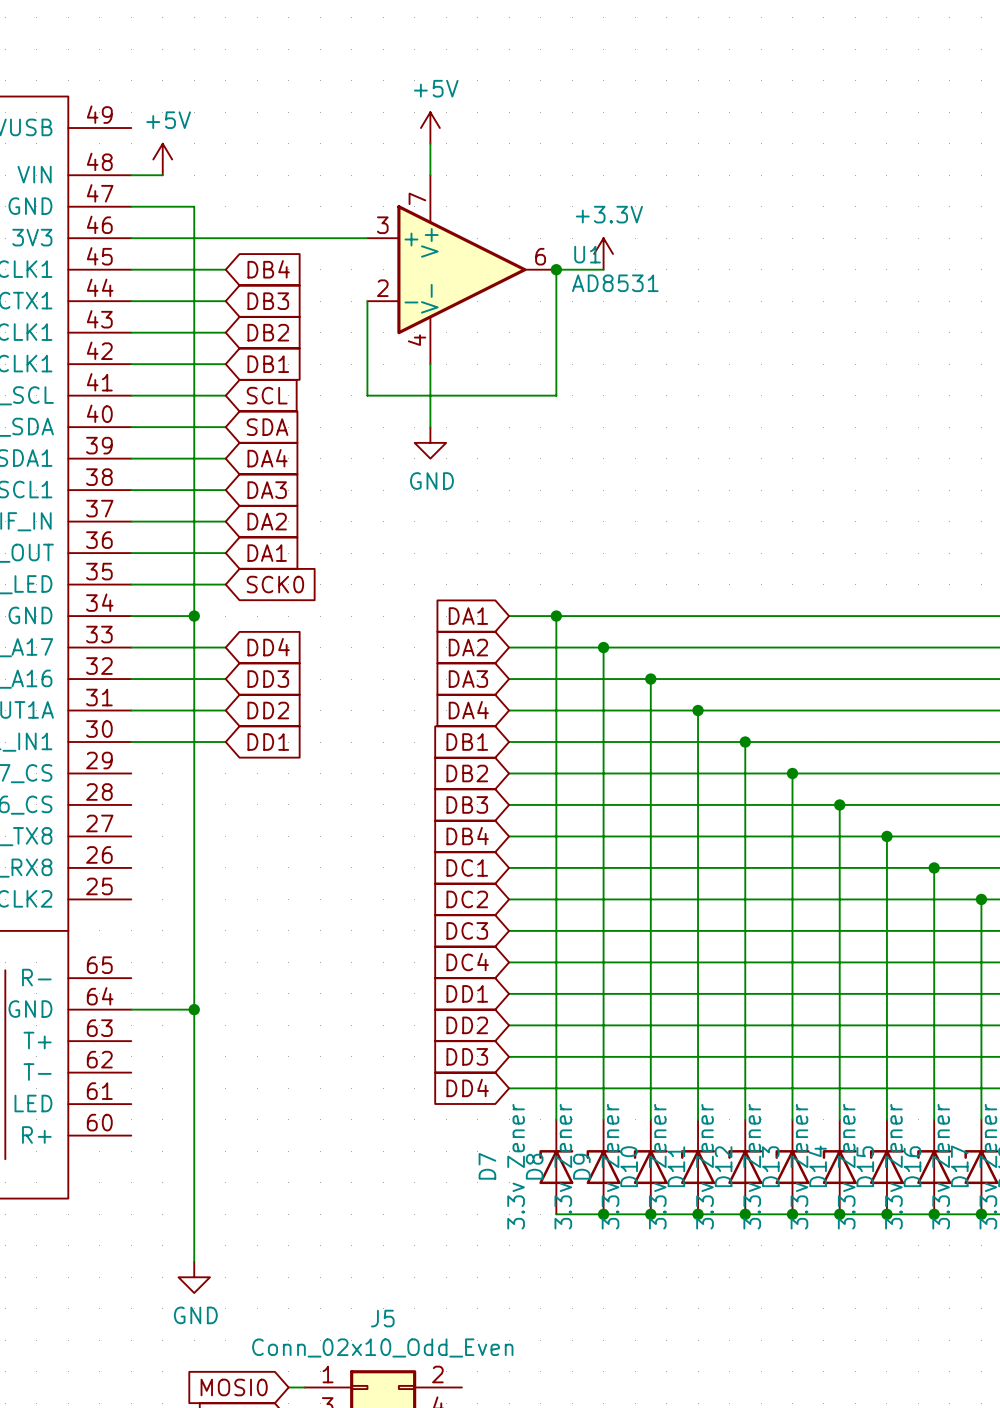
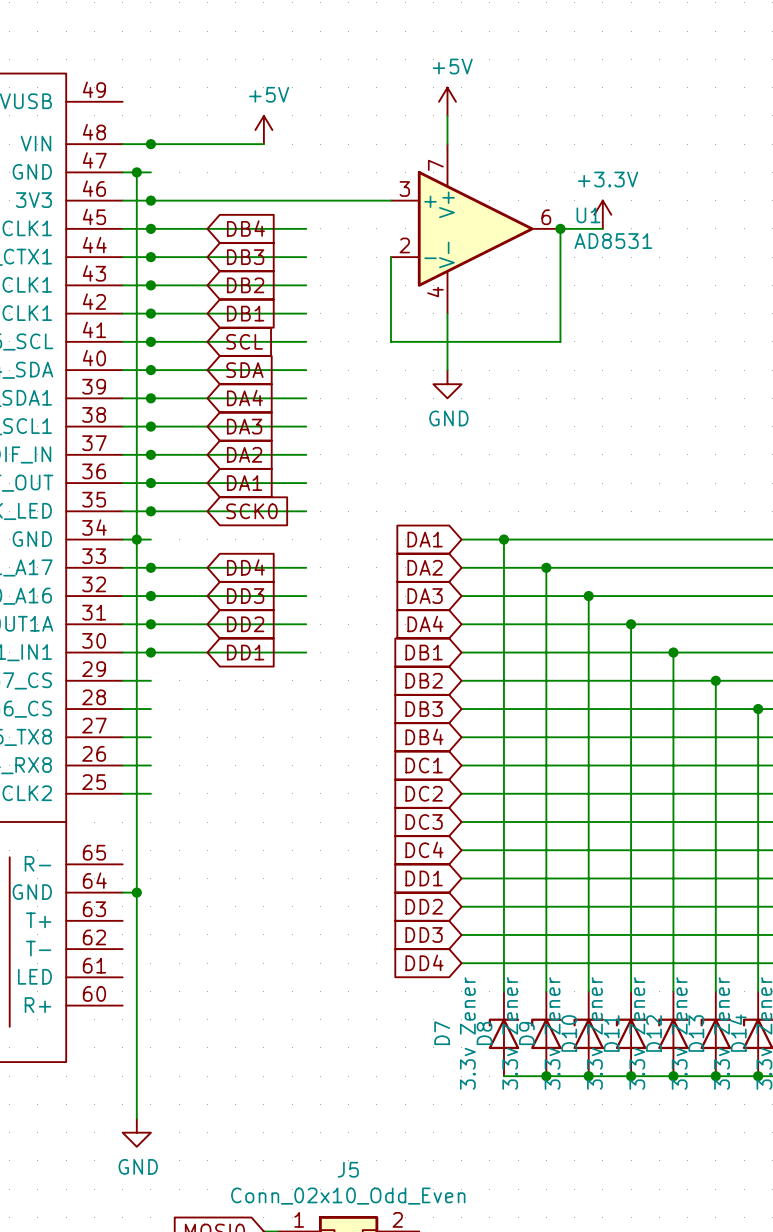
power symbol position: +5V (430, 128) -> +5V (447, 101)
wire: (430, 143) (430, 175) -> (447, 115) (447, 144)
power symbol: +5V (162, 159) -> none
power symbol: none -> +5V (263, 130)
wire: none -> (150, 144) (263, 144)
junction: none -> (150, 144)
wire: none -> (136, 172) (136, 1118)
junction: none -> (136, 172)
wire: (162, 206) (194, 206) (194, 1261) -> none
junction: none -> (150, 200)
power symbol position: +3.3V (603, 253) -> +3.3V (602, 214)
junction: none -> (150, 228)
wire: none -> (207, 228) (306, 228)
U1 position: (461, 269) -> (475, 228)
junction position: (556, 269) -> (560, 228)
wire: (603, 269) (556, 269) (556, 395) -> (602, 228) (560, 228) (560, 341) (503, 341)
junction: none -> (150, 257)
wire: none -> (207, 257) (306, 257)
wire: (367, 301) (367, 395) (430, 395) (430, 427) -> none
junction: none -> (150, 285)
wire: none -> (207, 285) (306, 285)
junction: none -> (150, 313)
wire: none -> (207, 313) (306, 313)
wire: none -> (447, 313) (447, 370)
junction: none -> (150, 341)
wire: none -> (207, 341) (306, 341)
junction: none -> (150, 370)
wire: none -> (207, 370) (306, 370)
power symbol position: GND (430, 442) -> GND (447, 384)
junction: none -> (150, 398)
wire: none -> (207, 398) (306, 398)
junction: none -> (150, 426)
wire: none -> (207, 426) (306, 426)
junction: none -> (150, 454)
wire: none -> (207, 454) (306, 454)
junction: none -> (150, 483)
wire: none -> (207, 483) (306, 483)
junction: none -> (150, 511)
wire: none -> (207, 511) (306, 511)
junction: none -> (136, 539)
wire: (162, 616) (194, 616) -> (122, 680) (150, 680)
junction: (194, 616) -> none
junction: none -> (150, 567)
wire: none -> (207, 567) (306, 567)
junction: none -> (150, 596)
wire: none -> (207, 596) (306, 596)
junction: none -> (150, 624)
wire: none -> (207, 624) (306, 624)
junction: none -> (150, 652)
wire: none -> (207, 652) (306, 652)
wire: none -> (122, 709) (150, 709)
wire: none -> (122, 737) (150, 737)
wire: none -> (122, 765) (150, 765)
wire: none -> (122, 793) (150, 793)
wire: (147, 1009) (194, 1009) -> none
junction position: (194, 1009) -> (136, 892)
power symbol position: GND (194, 1277) -> GND (136, 1132)

